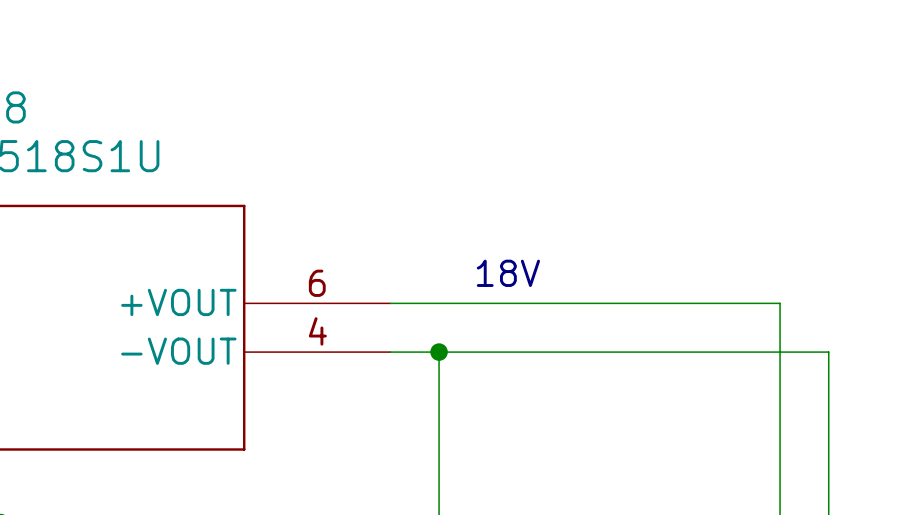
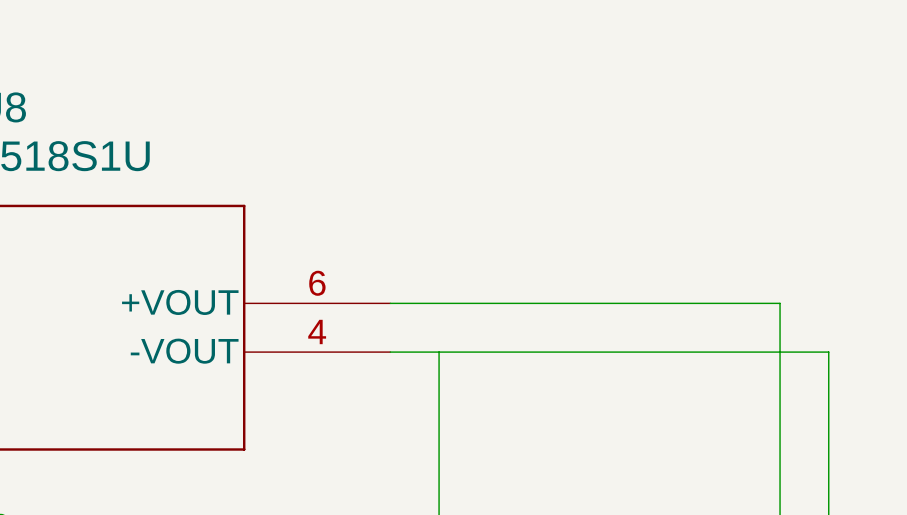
text: 18V (508, 273) -> none
junction: (439, 352) -> none

